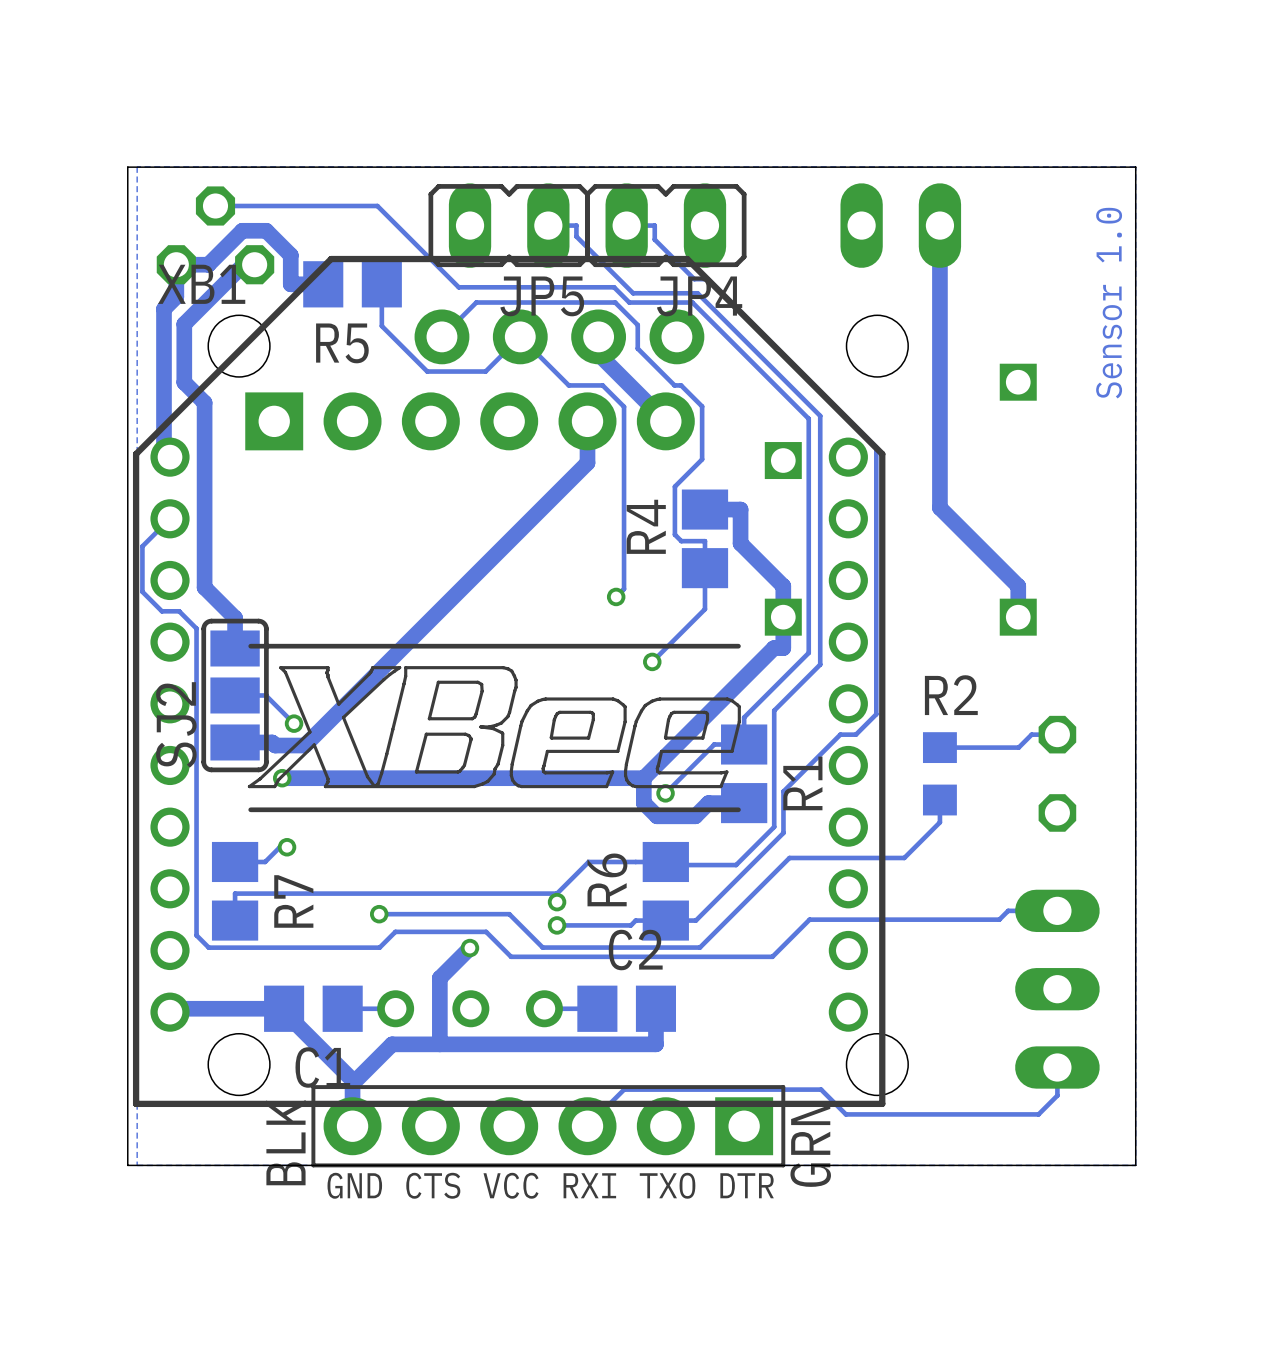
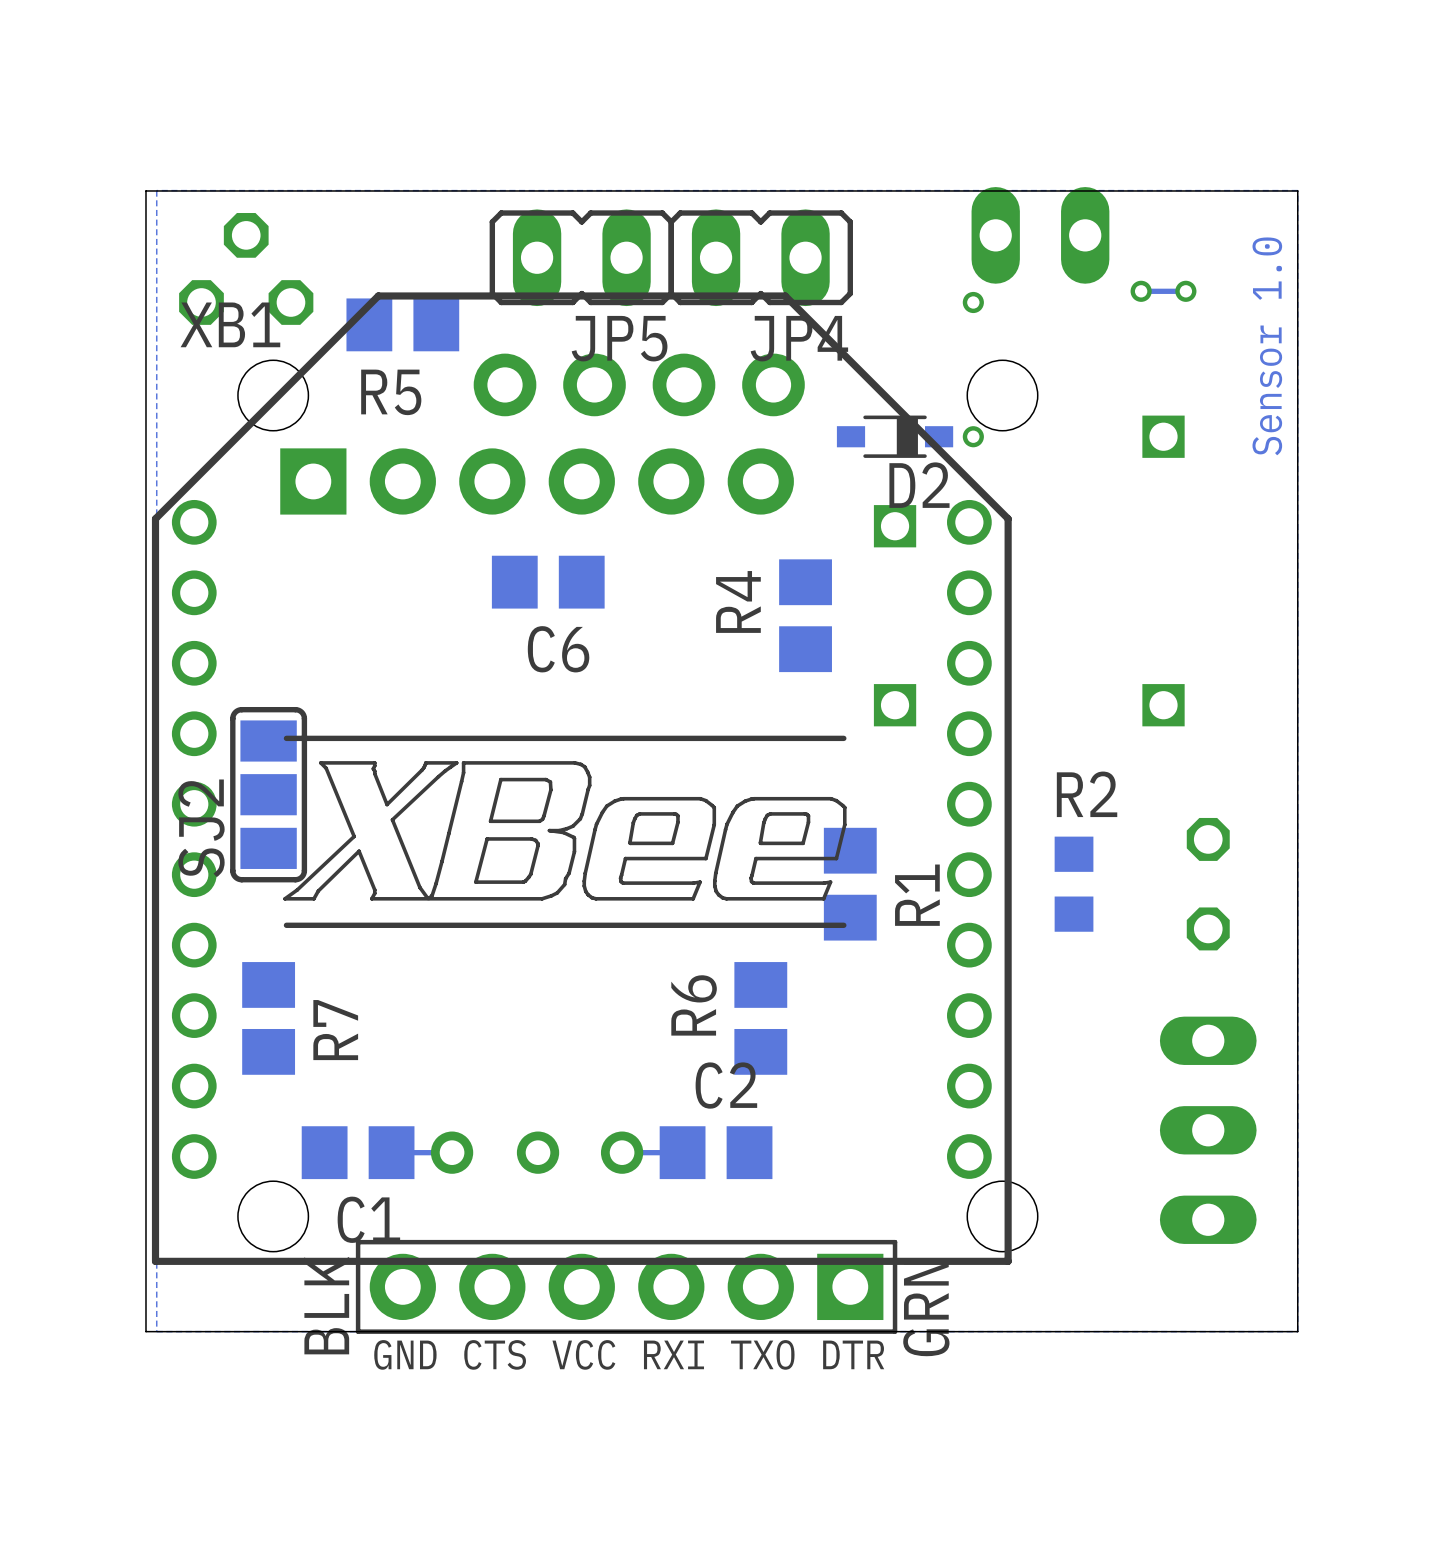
track: (215, 205) (377, 205) (458, 287) (614, 287) (629, 302) (692, 302) (808, 418) (808, 652) (744, 717) (744, 744) (714, 744) -> none
track: (548, 225) (576, 225) (576, 236) (633, 293) (697, 293) (820, 415) (820, 664) (774, 710) (774, 826) (736, 865) (665, 865) (665, 861) (588, 861) (557, 893) -> none
track: (626, 225) (654, 225) (654, 239) (694, 279) (707, 279) (876, 447) (876, 714) (855, 734) (840, 734) (783, 791) (783, 832) (695, 920) (635, 920) (630, 925) (557, 925) -> none
part position: (900, 225) -> (1040, 235)
track: (939, 225) (939, 507) (1018, 586) (1018, 617) -> none
via: none -> (1141, 291)
track: none -> (1185, 291) (1141, 291)
via: none -> (1185, 291)
track: (254, 264) (243, 264) (184, 324) (184, 382) (204, 402) (204, 587) (235, 618) (235, 648) -> none
via: none -> (973, 302)
track: (323, 284) (290, 284) (290, 255) (266, 230) (242, 230) (208, 264) (176, 264) (176, 296) (163, 309) (163, 451) (170, 457) -> none
track: (381, 284) (381, 326) (427, 371) (485, 371) (520, 336) (568, 385) (602, 385) (624, 406) (624, 589) (616, 596) -> none
track: (441, 336) (476, 302) (615, 302) (637, 325) (637, 348) (674, 385) (681, 385) (702, 406) (702, 459) (674, 486) (674, 534) (681, 541) (704, 541) (704, 609) (652, 661) -> none
track: (598, 336) (598, 354) (665, 421) -> none
D2: none -> (895, 436)
via: none -> (973, 436)
track: (587, 421) (587, 462) (304, 745) (275, 745) (272, 742) (235, 742) -> none
C6: none -> (548, 582)
track: (704, 509) (740, 509) (740, 543) (783, 586) (783, 648) (773, 648) (643, 778) -> none
track: (170, 518) (142, 546) (142, 591) (161, 611) (179, 611) (196, 628) (196, 935) (208, 947) (379, 947) (395, 931) (486, 931) (511, 956) (772, 956) (809, 919) (999, 919) (1008, 910) (1057, 910) -> none
via: (616, 596) -> none
via: (652, 661) -> none
track: (235, 695) (266, 695) (294, 723) -> none
via: (294, 723) -> none
track: (1057, 734) (1031, 734) (1018, 747) (939, 747) -> none
track: (714, 744) (665, 793) -> none
via: (282, 778) -> none
track: (643, 778) (282, 778) -> none
track: (643, 778) (643, 803) (657, 816) (695, 816) (708, 803) (744, 803) -> none
via: (665, 793) -> none
track: (939, 800) (939, 822) (904, 857) (789, 857) (699, 947) (542, 947) (509, 914) (379, 914) -> none
track: (287, 847) (279, 847) (265, 861) (235, 861) -> none
via: (287, 847) -> none
track: (557, 893) (235, 893) (235, 920) -> none
via: (557, 902) -> none
via: (379, 914) -> none
via: (557, 925) -> none
track: (469, 948) (439, 978) (439, 1044) -> none
via: (469, 948) -> none
track: (655, 1008) (655, 1044) (392, 1044) (352, 1083) (352, 1126) -> none
track: (170, 1012) (173, 1008) (284, 1008) (284, 1011) (354, 1082) -> none
track: (1057, 1067) (1057, 1095) (1038, 1114) (845, 1114) (821, 1089) (624, 1089) (587, 1126) -> none

